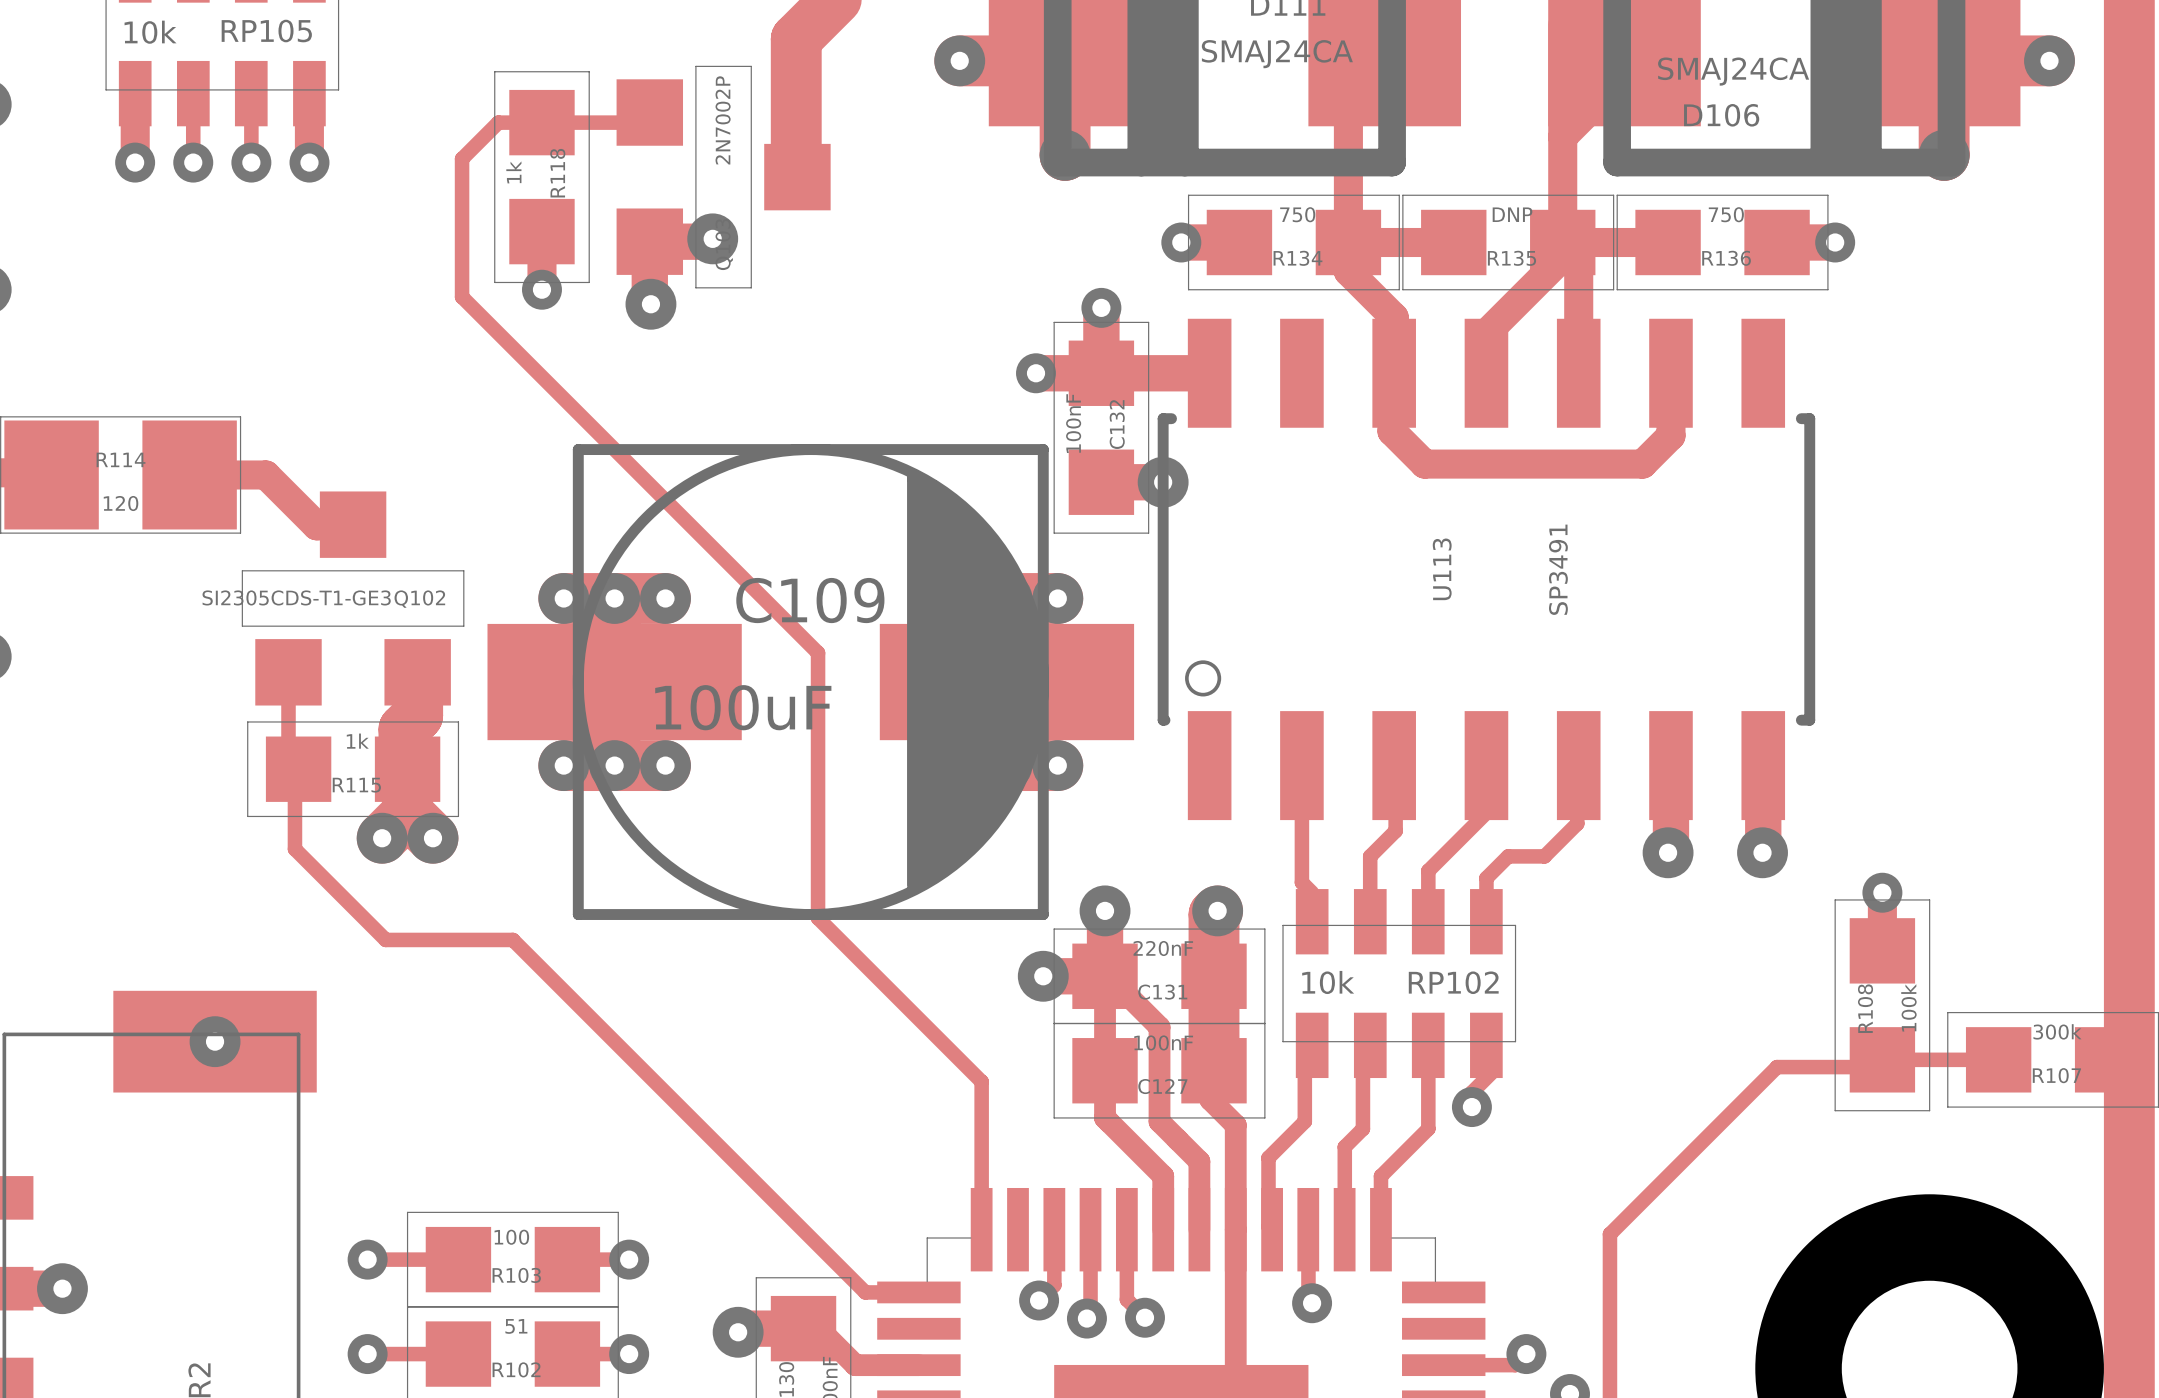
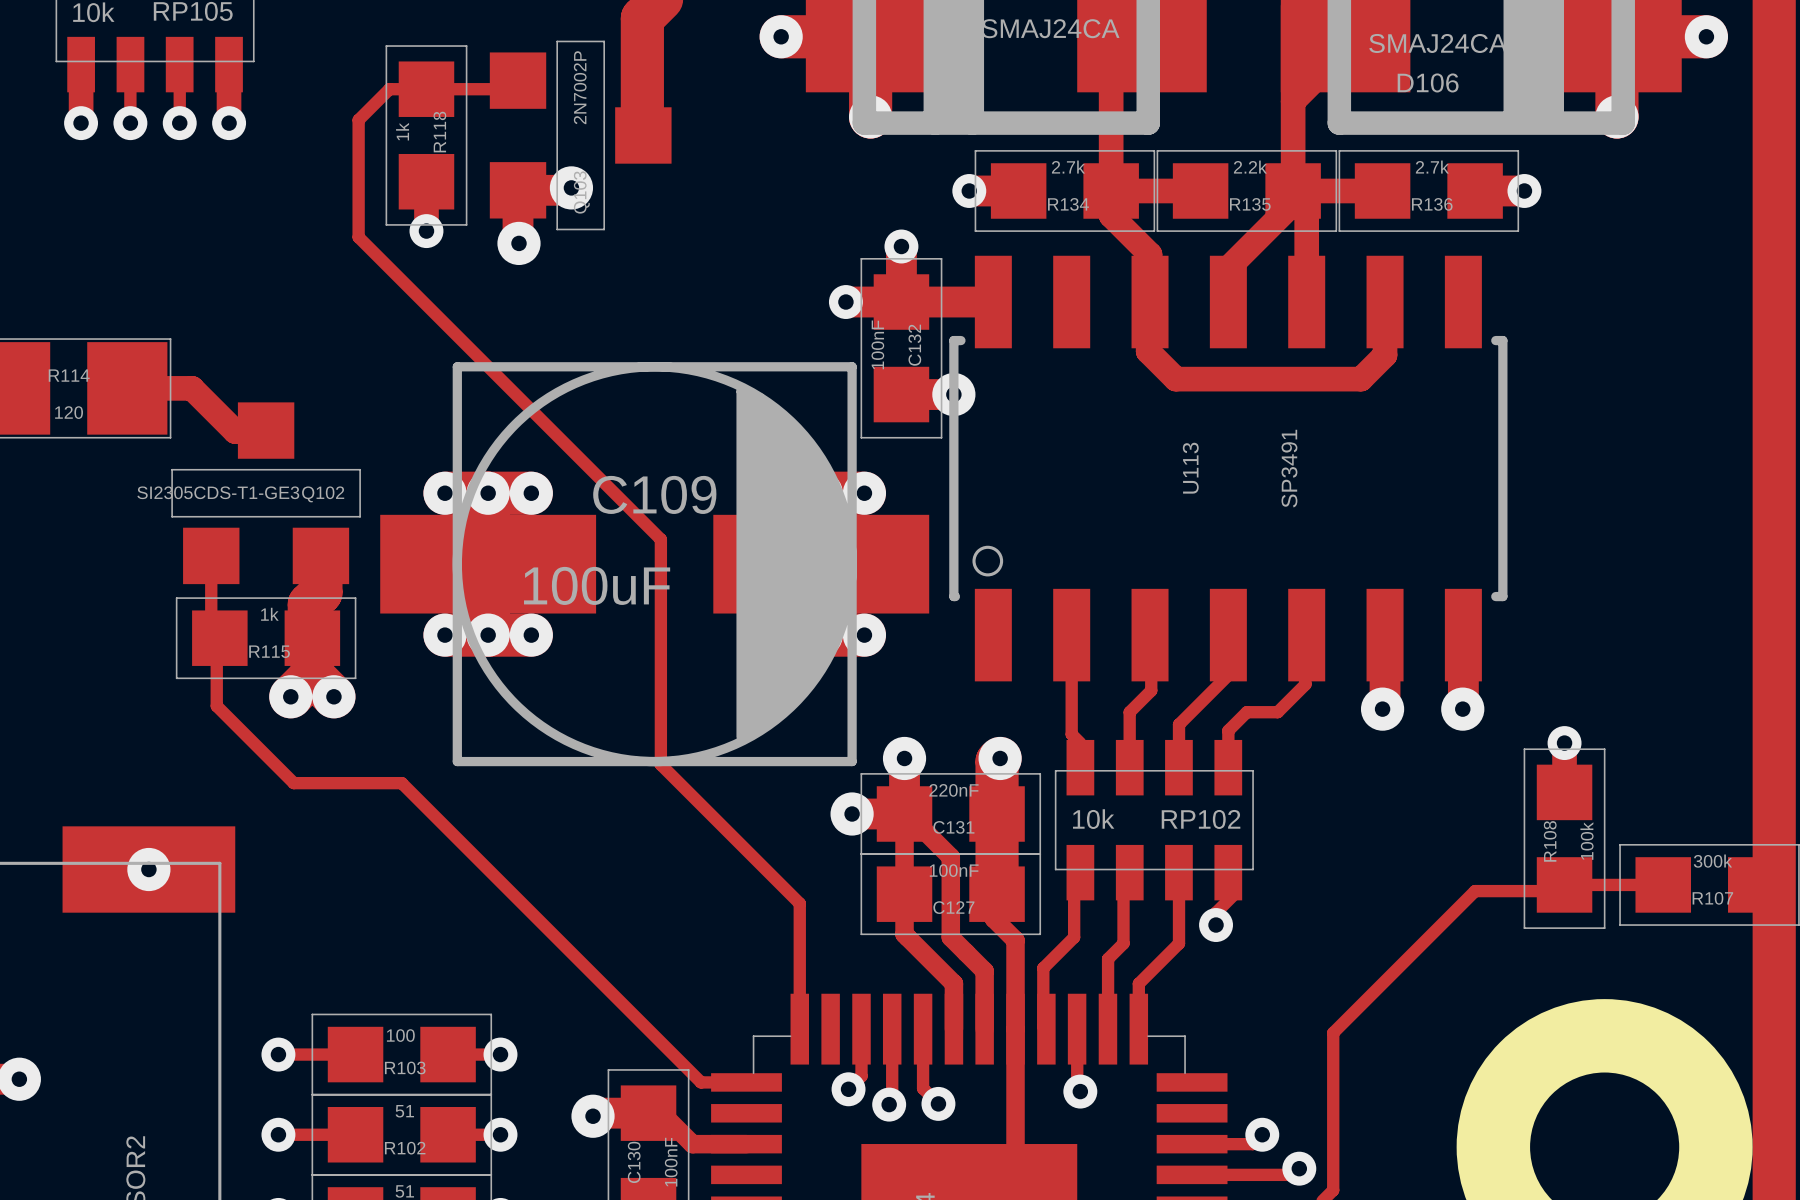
R134 value: 750 (1297, 214) -> 2.7k (1068, 167)
R135 value: DNP (1512, 214) -> 2.2k (1250, 167)
R136 value: 750 (1726, 214) -> 2.7k (1432, 167)

